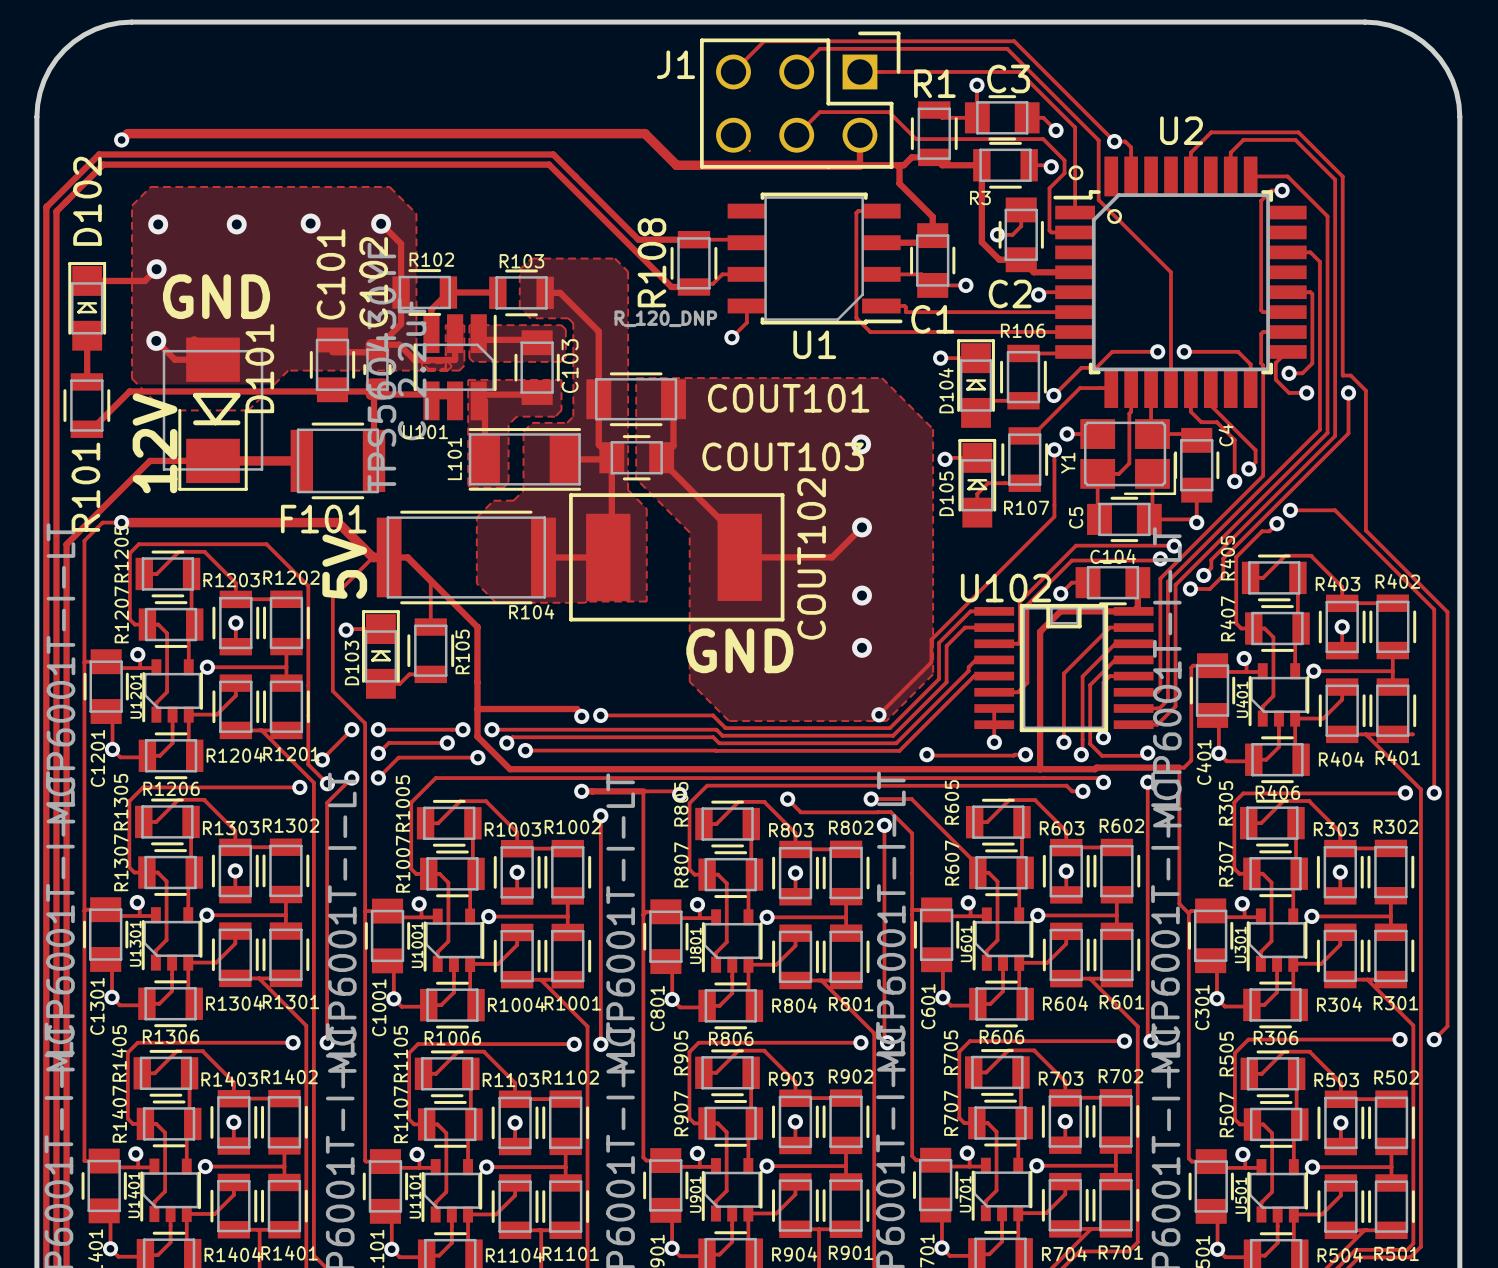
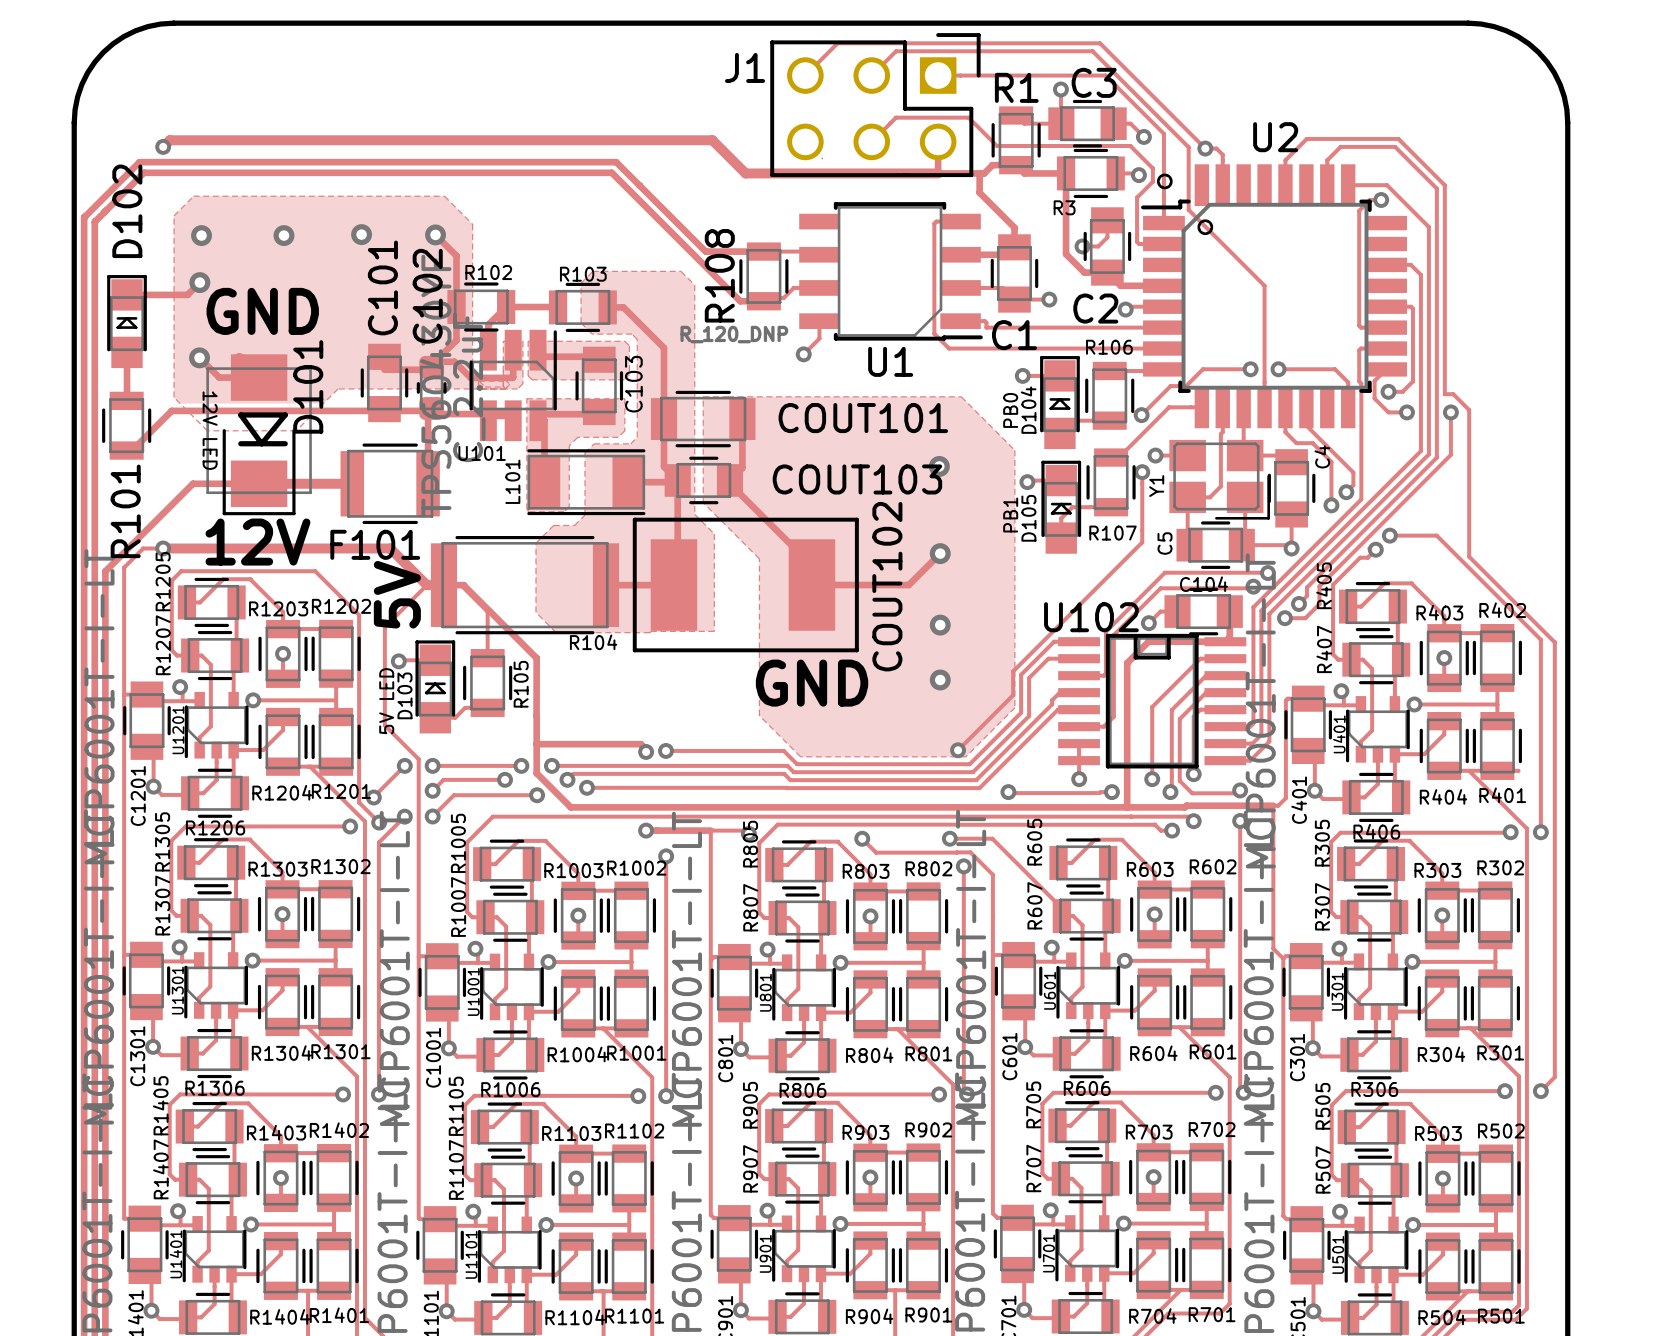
text: none -> PB0 (1010, 410)
text: none -> 12V LED (210, 430)
text rotation: 0° (155, 443) -> 90° clockwise (257, 542)
text: none -> PB1 (1010, 514)
text: none -> 5V LED (386, 701)

